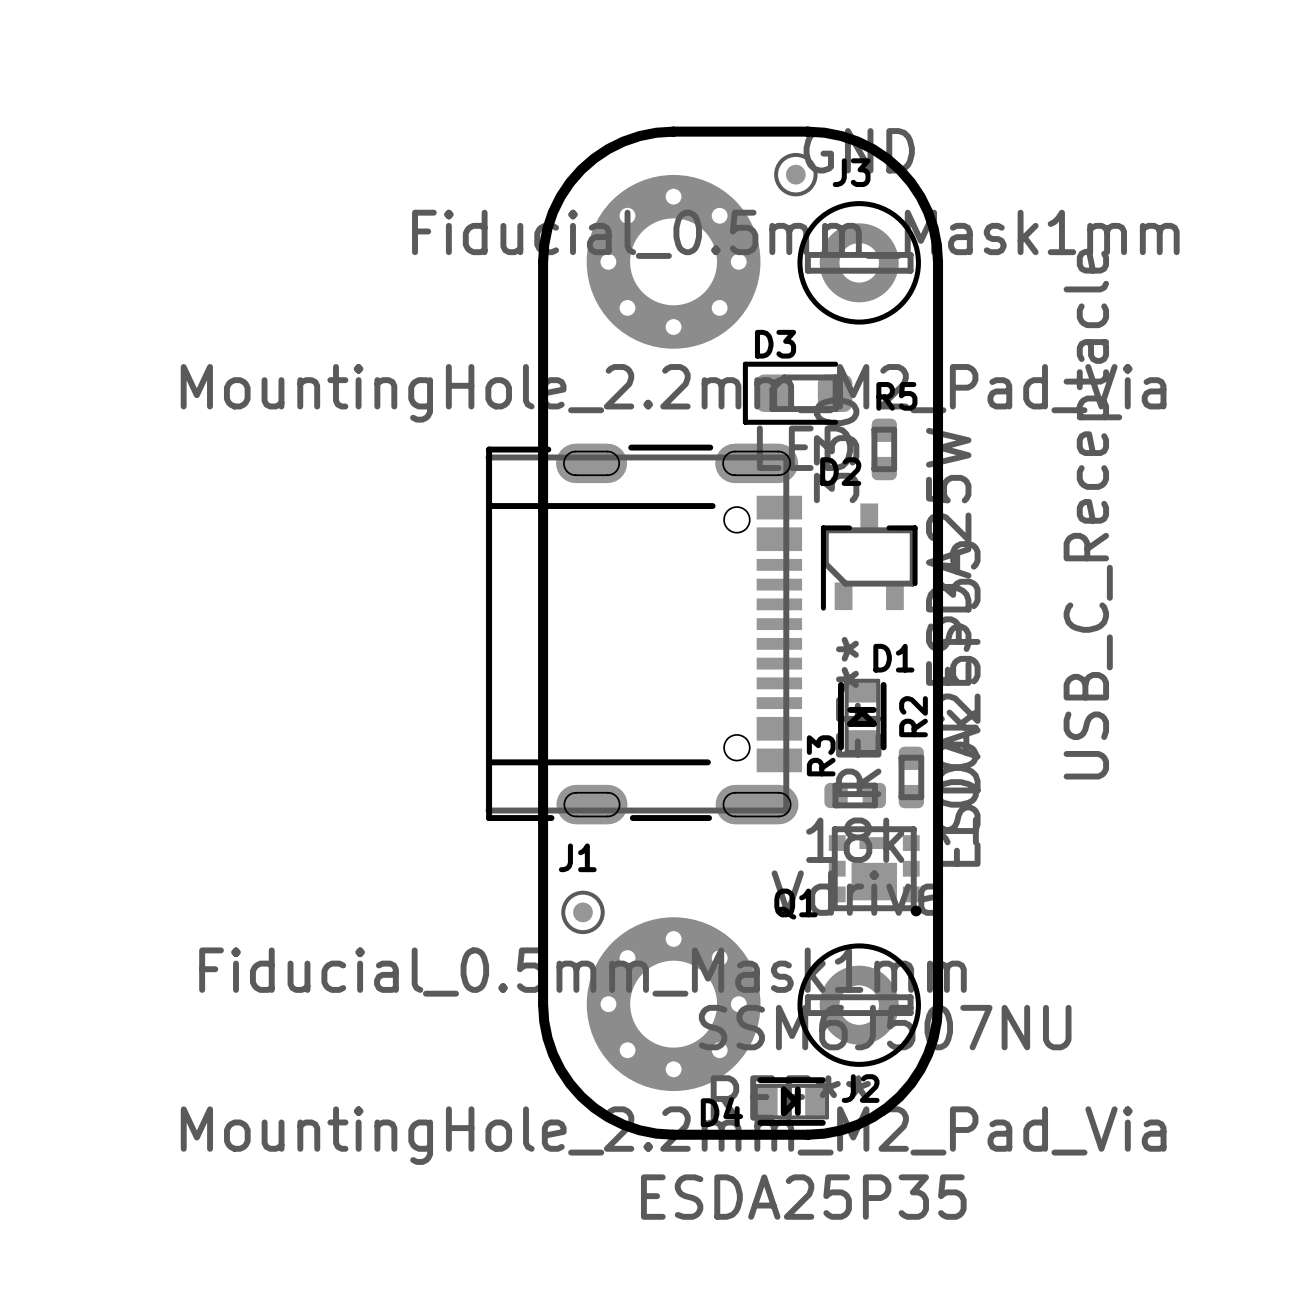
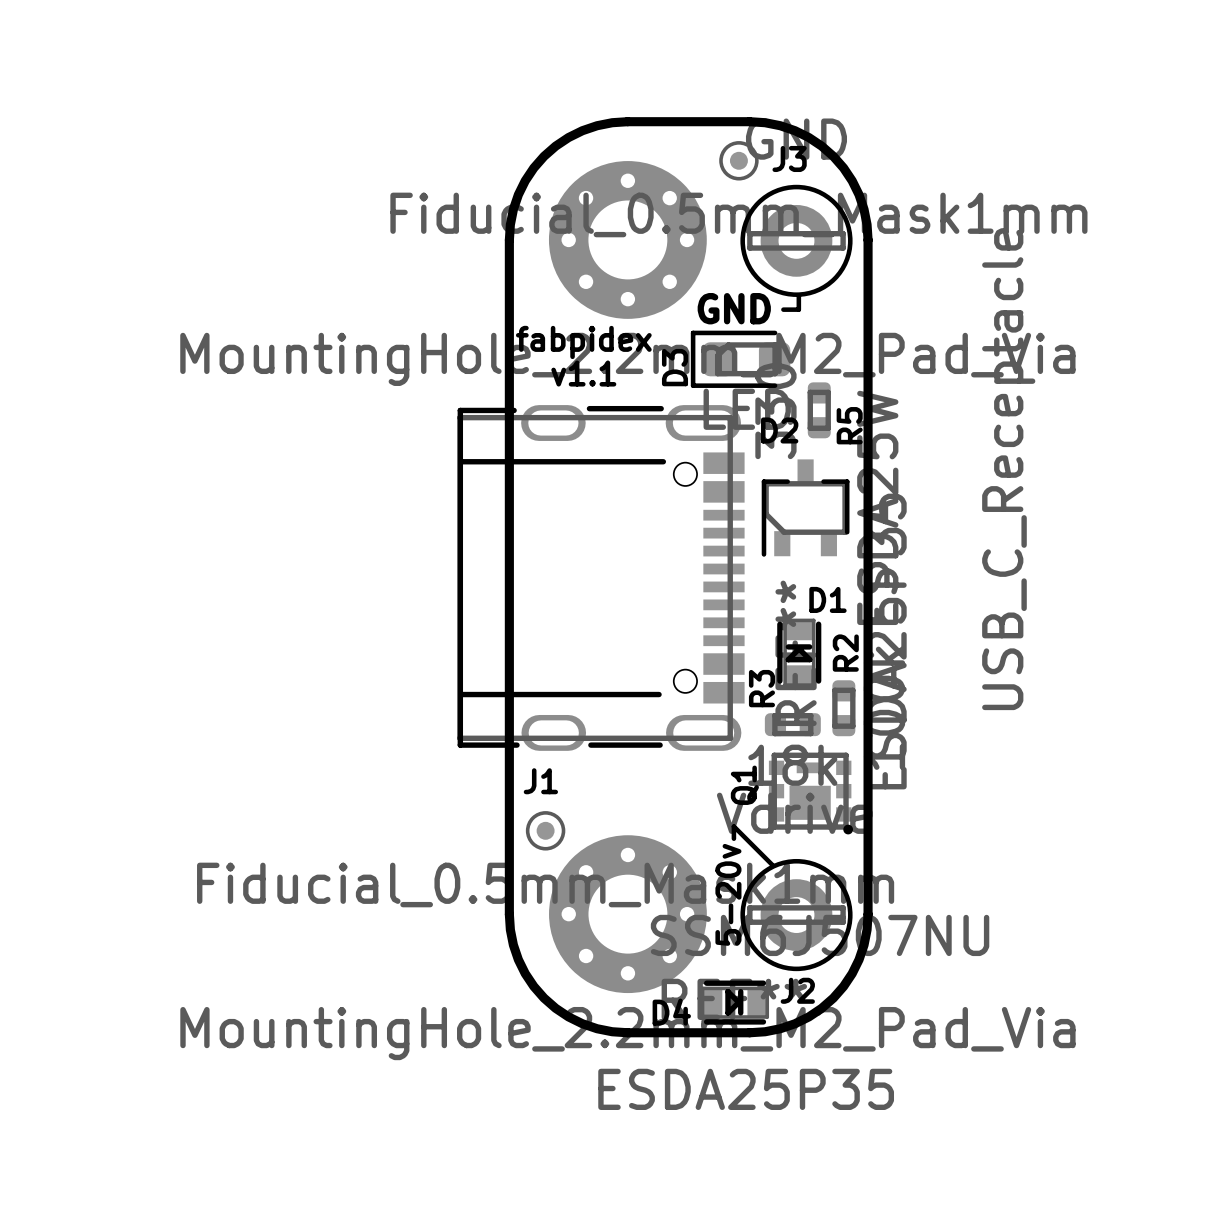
line: none -> (798, 295) (798, 309) (783, 309)
text: none -> GND (734, 308)
D3 name rotation: 0° (775, 344) -> 90° counterclockwise (674, 367)
D3 name position: D3 (775, 344) -> D3 (674, 367)
text: none -> fabpidex (583, 342)
R5 name rotation: 0° (896, 396) -> 90° counterclockwise (849, 425)
R5 name position: R5 (896, 396) -> R5 (849, 425)
text: none -> v1.1 (583, 373)
J1 footprint: [485, 443, 803, 825] -> [457, 405, 745, 751]
Q1 name rotation: 0° (796, 904) -> 90° counterclockwise (744, 785)
line: none -> (733, 838) (733, 826) (772, 865)
text: none -> 5-20v (728, 894)

